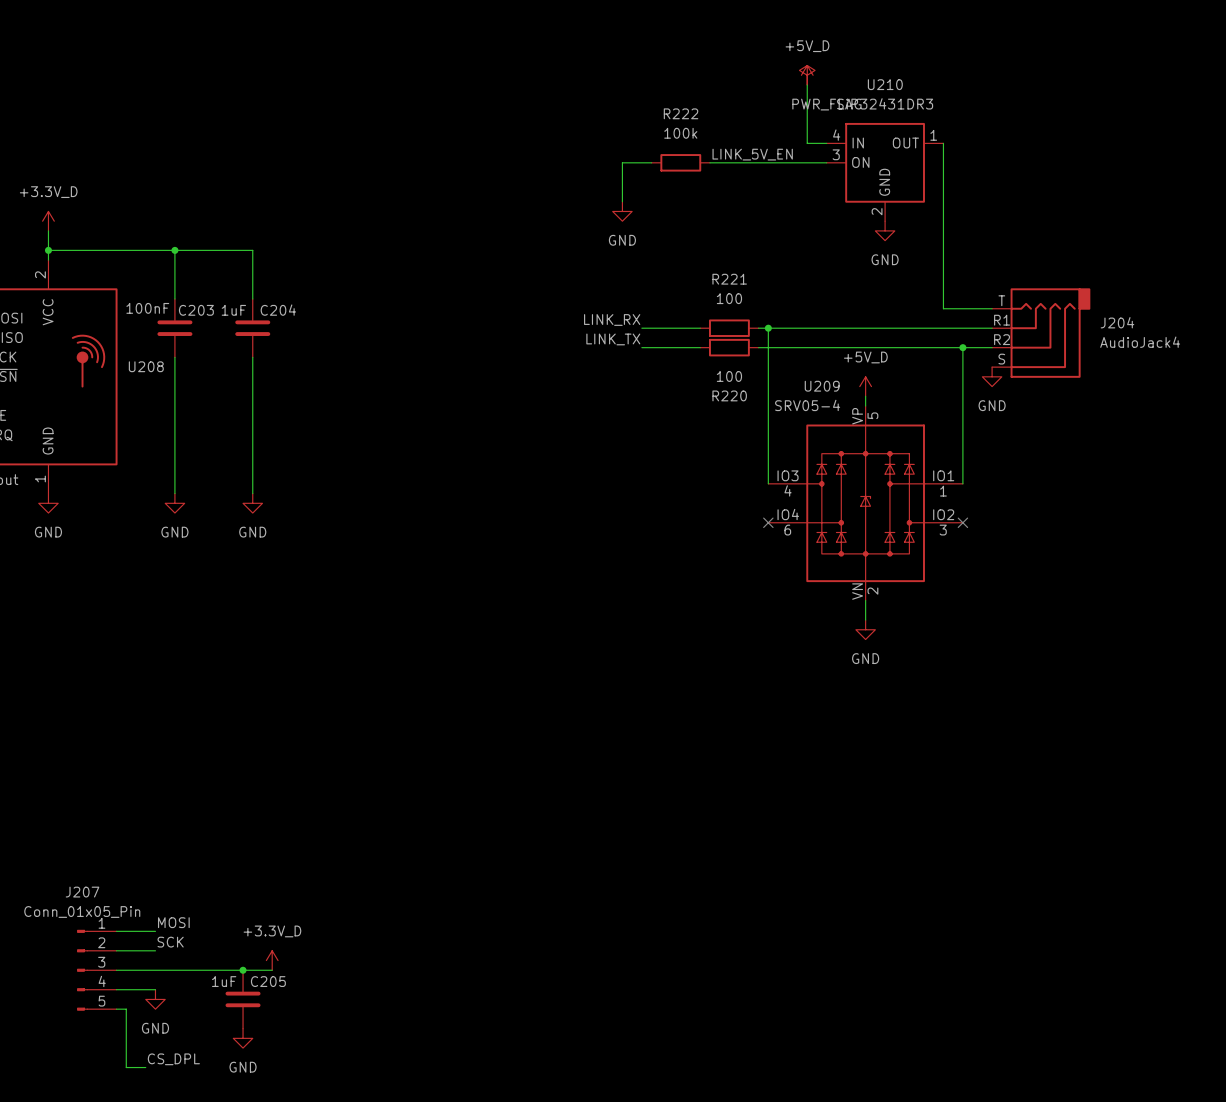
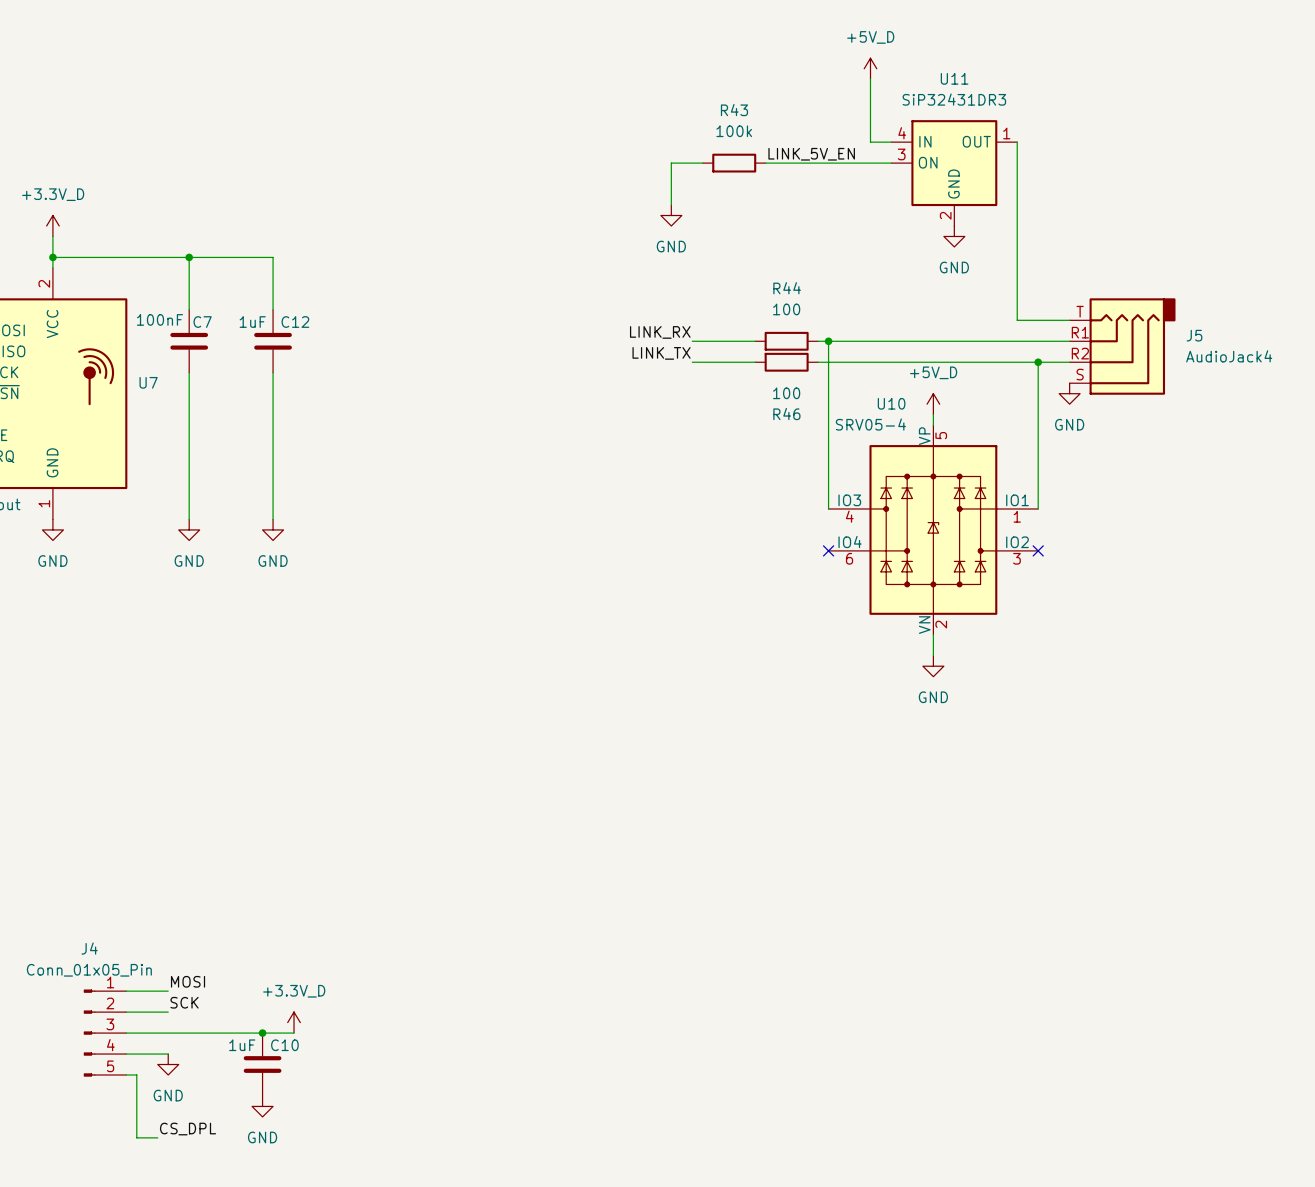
power symbol: PWR_FLAG (807, 75) -> none
U210 name: U210 (885, 84) -> U11 (954, 78)
R222 name: R222 (681, 113) -> R43 (734, 110)
R221 name: R221 (729, 279) -> R44 (787, 288)
C203 name: C203 (196, 310) -> C7 (202, 322)
C204 name: C204 (278, 310) -> C12 (295, 322)
J204 name: J204 (1117, 322) -> J5 (1194, 335)
U208 name: U208 (146, 366) -> U7 (148, 382)
U209 name: U209 (822, 386) -> U10 (891, 403)
R220 name: R220 (729, 395) -> R46 (786, 414)
J207 name: J207 (82, 892) -> J4 (89, 948)
C205 name: C205 (268, 981) -> C10 (284, 1045)

